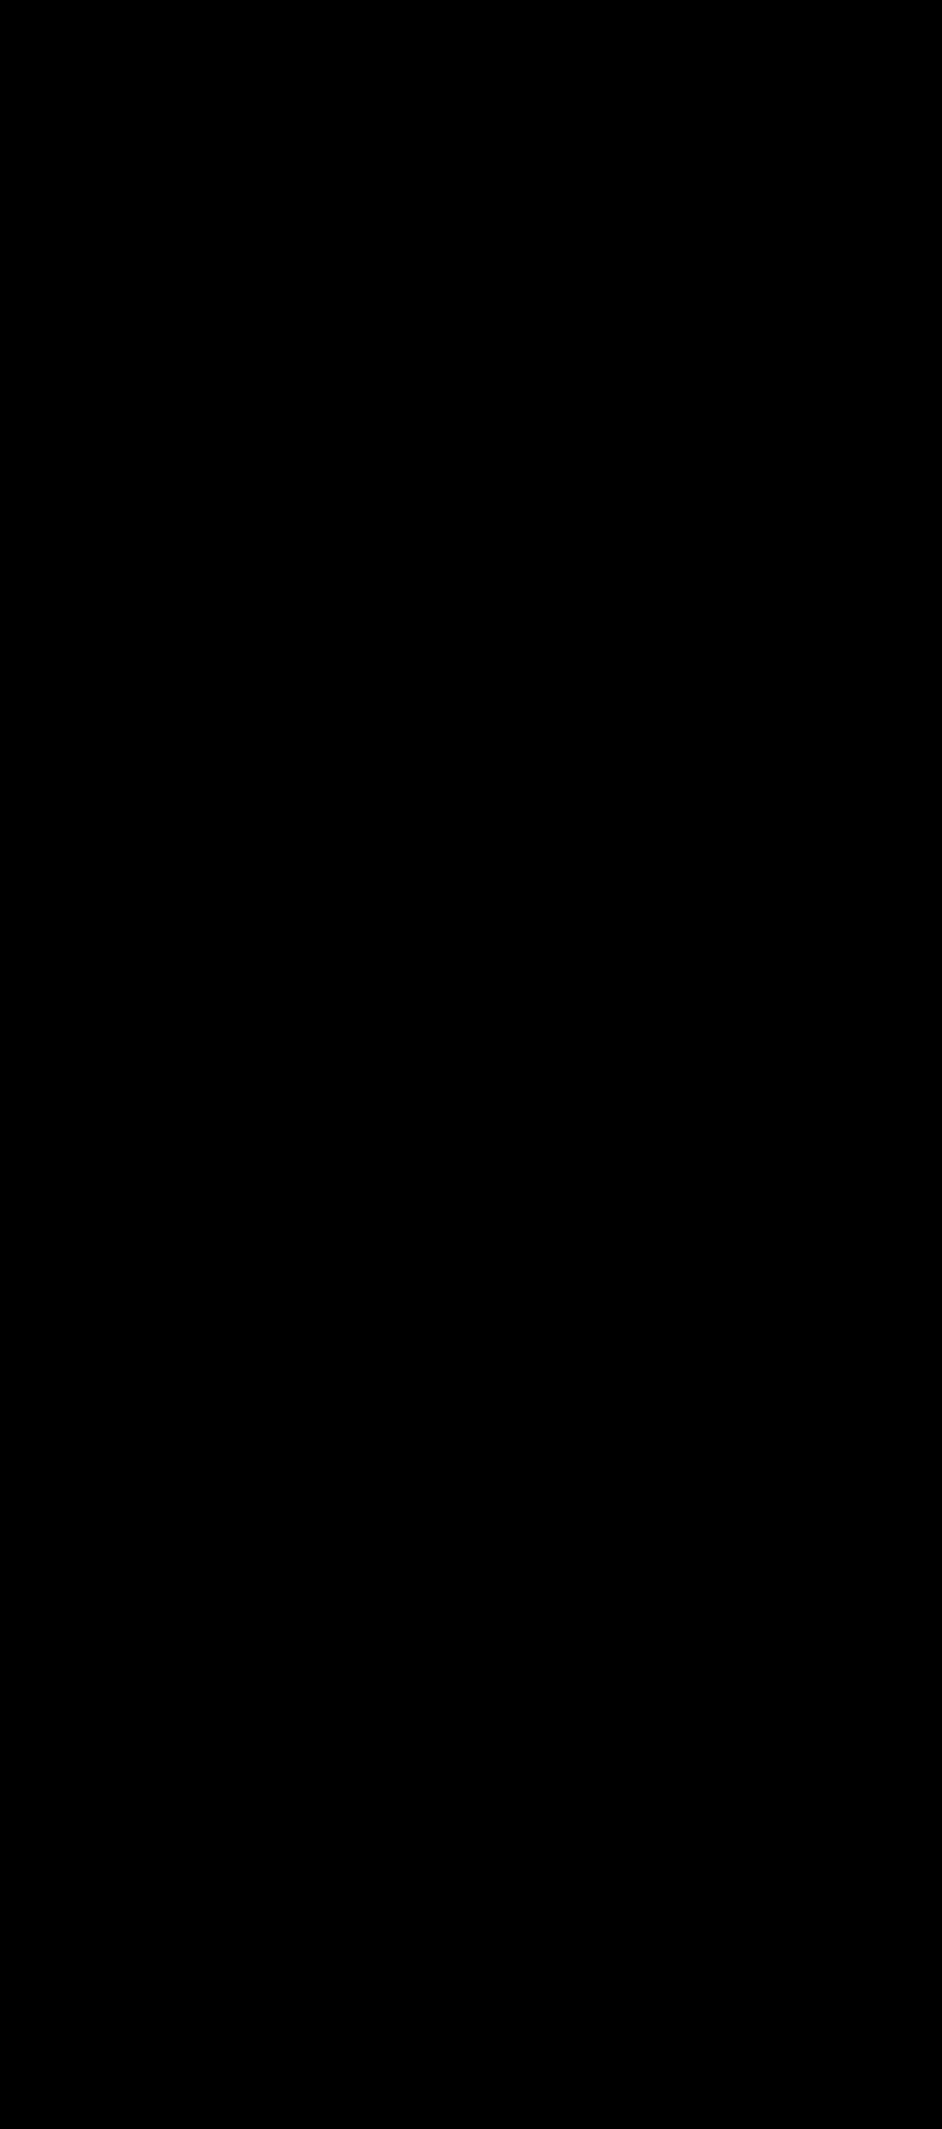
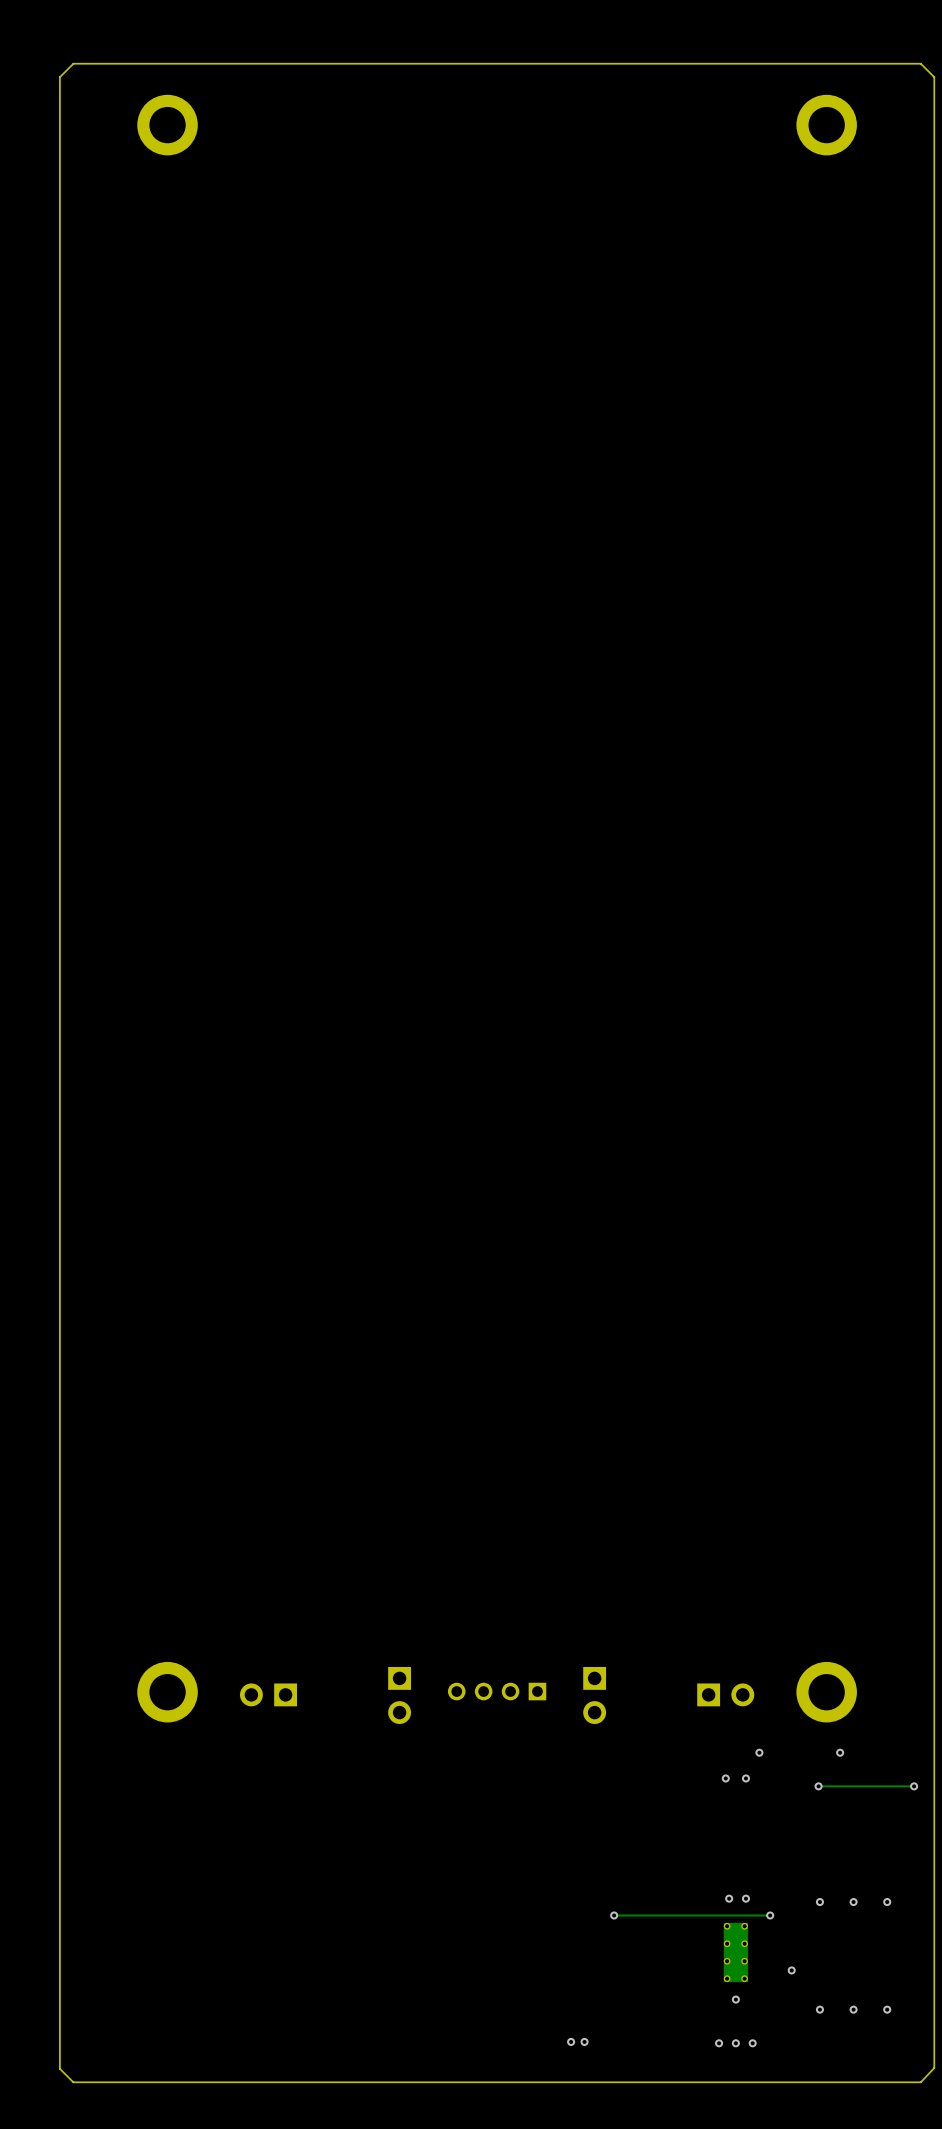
board edge: none -> (920, 63) (73, 63) (59, 77) (59, 2068) (73, 2082) (920, 2082) (934, 2068) (934, 77) (920, 63)
part: none -> (167, 125)
part: none -> (826, 125)
part: none -> (497, 1691)
part: none -> (167, 1692)
part: none -> (826, 1692)
part: none -> (268, 1694)
part: none -> (725, 1694)
part: none -> (399, 1695)
part: none -> (594, 1695)
via: none -> (759, 1752)
via: none -> (840, 1752)
via: none -> (725, 1778)
via: none -> (745, 1778)
via: none -> (818, 1786)
track: none -> (914, 1786) (818, 1786)
via: none -> (914, 1786)
via: none -> (729, 1898)
via: none -> (745, 1898)
via: none -> (819, 1902)
via: none -> (853, 1902)
via: none -> (887, 1902)
via: none -> (614, 1915)
track: none -> (770, 1915) (614, 1915)
via: none -> (770, 1915)
part: none -> (735, 1952)
via: none -> (791, 1970)
via: none -> (735, 1999)
via: none -> (819, 2009)
via: none -> (853, 2009)
via: none -> (887, 2009)
via: none -> (571, 2041)
via: none -> (584, 2041)
via: none -> (719, 2043)
via: none -> (735, 2043)
via: none -> (752, 2043)

